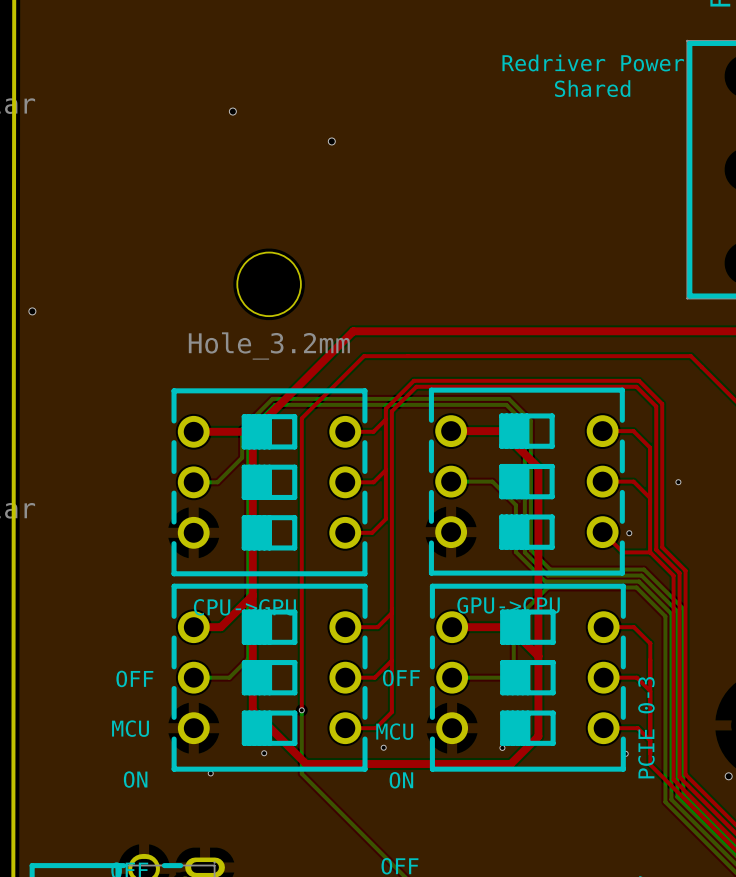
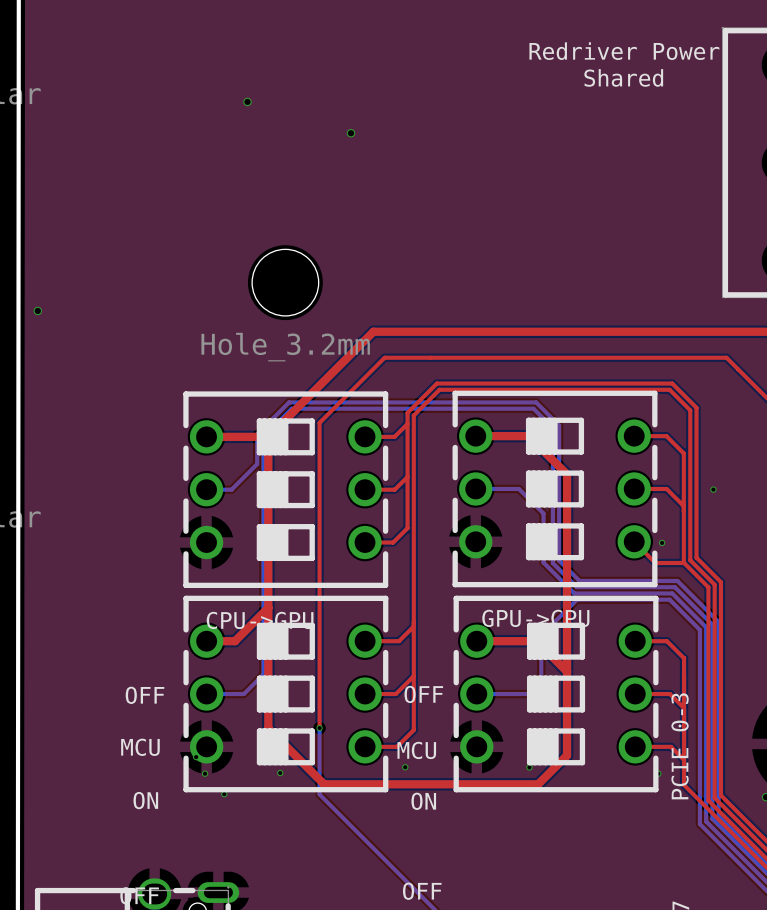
via: none -> (196, 757)
via: none -> (205, 773)

